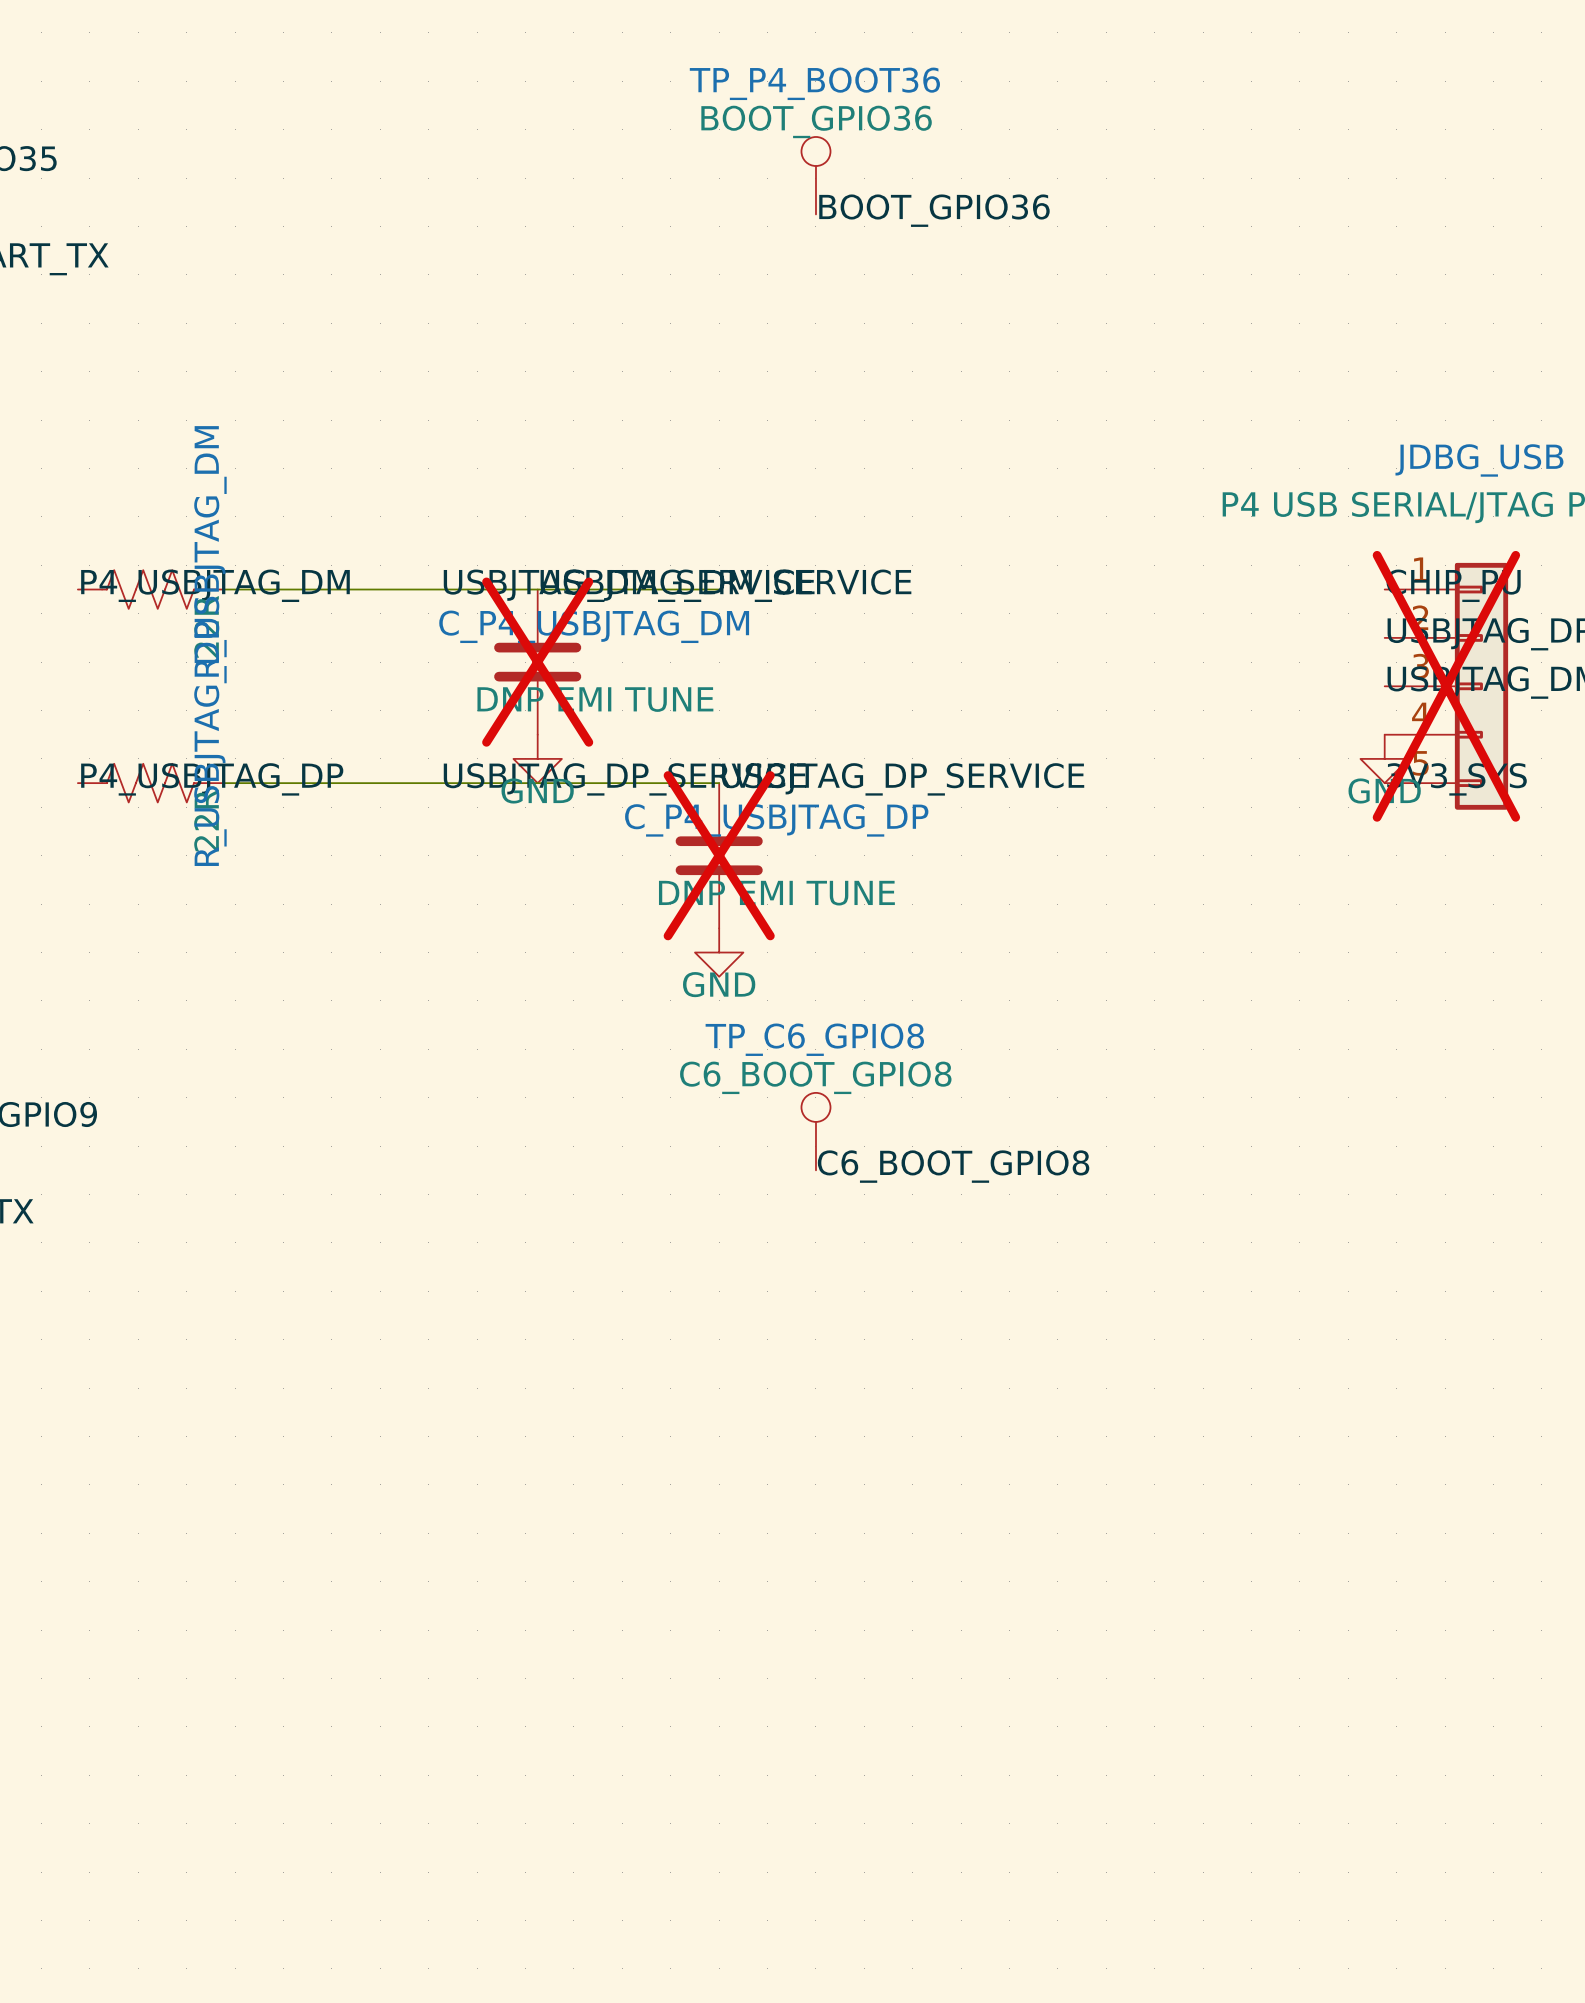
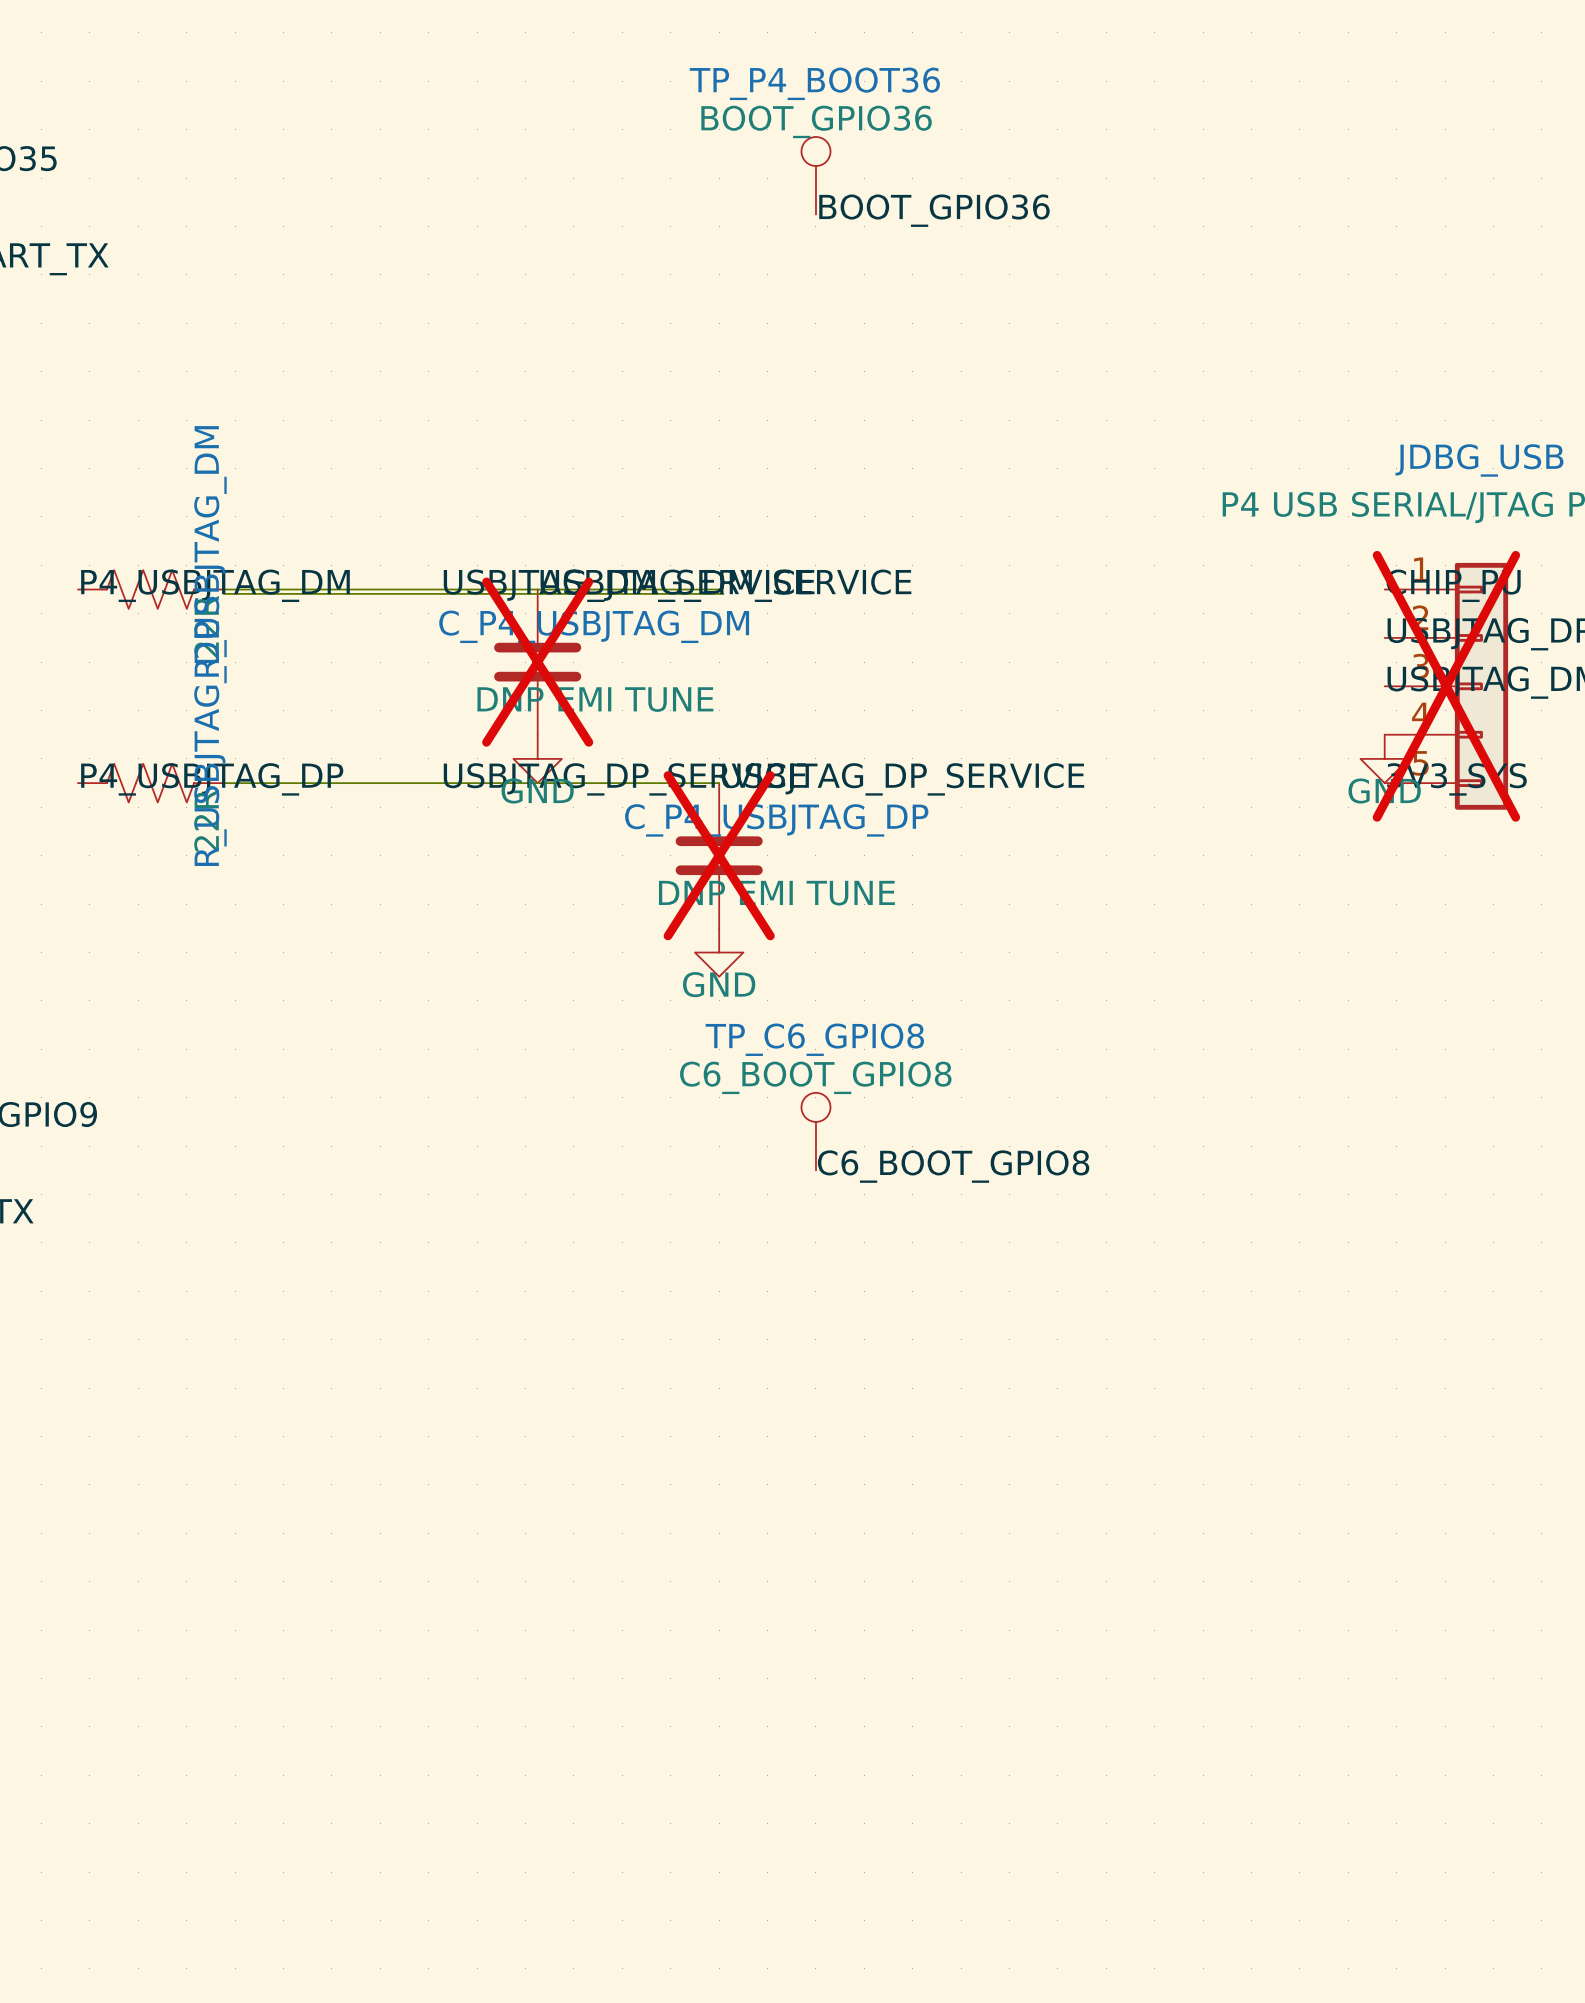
wire: none -> (224, 593) (723, 593)

